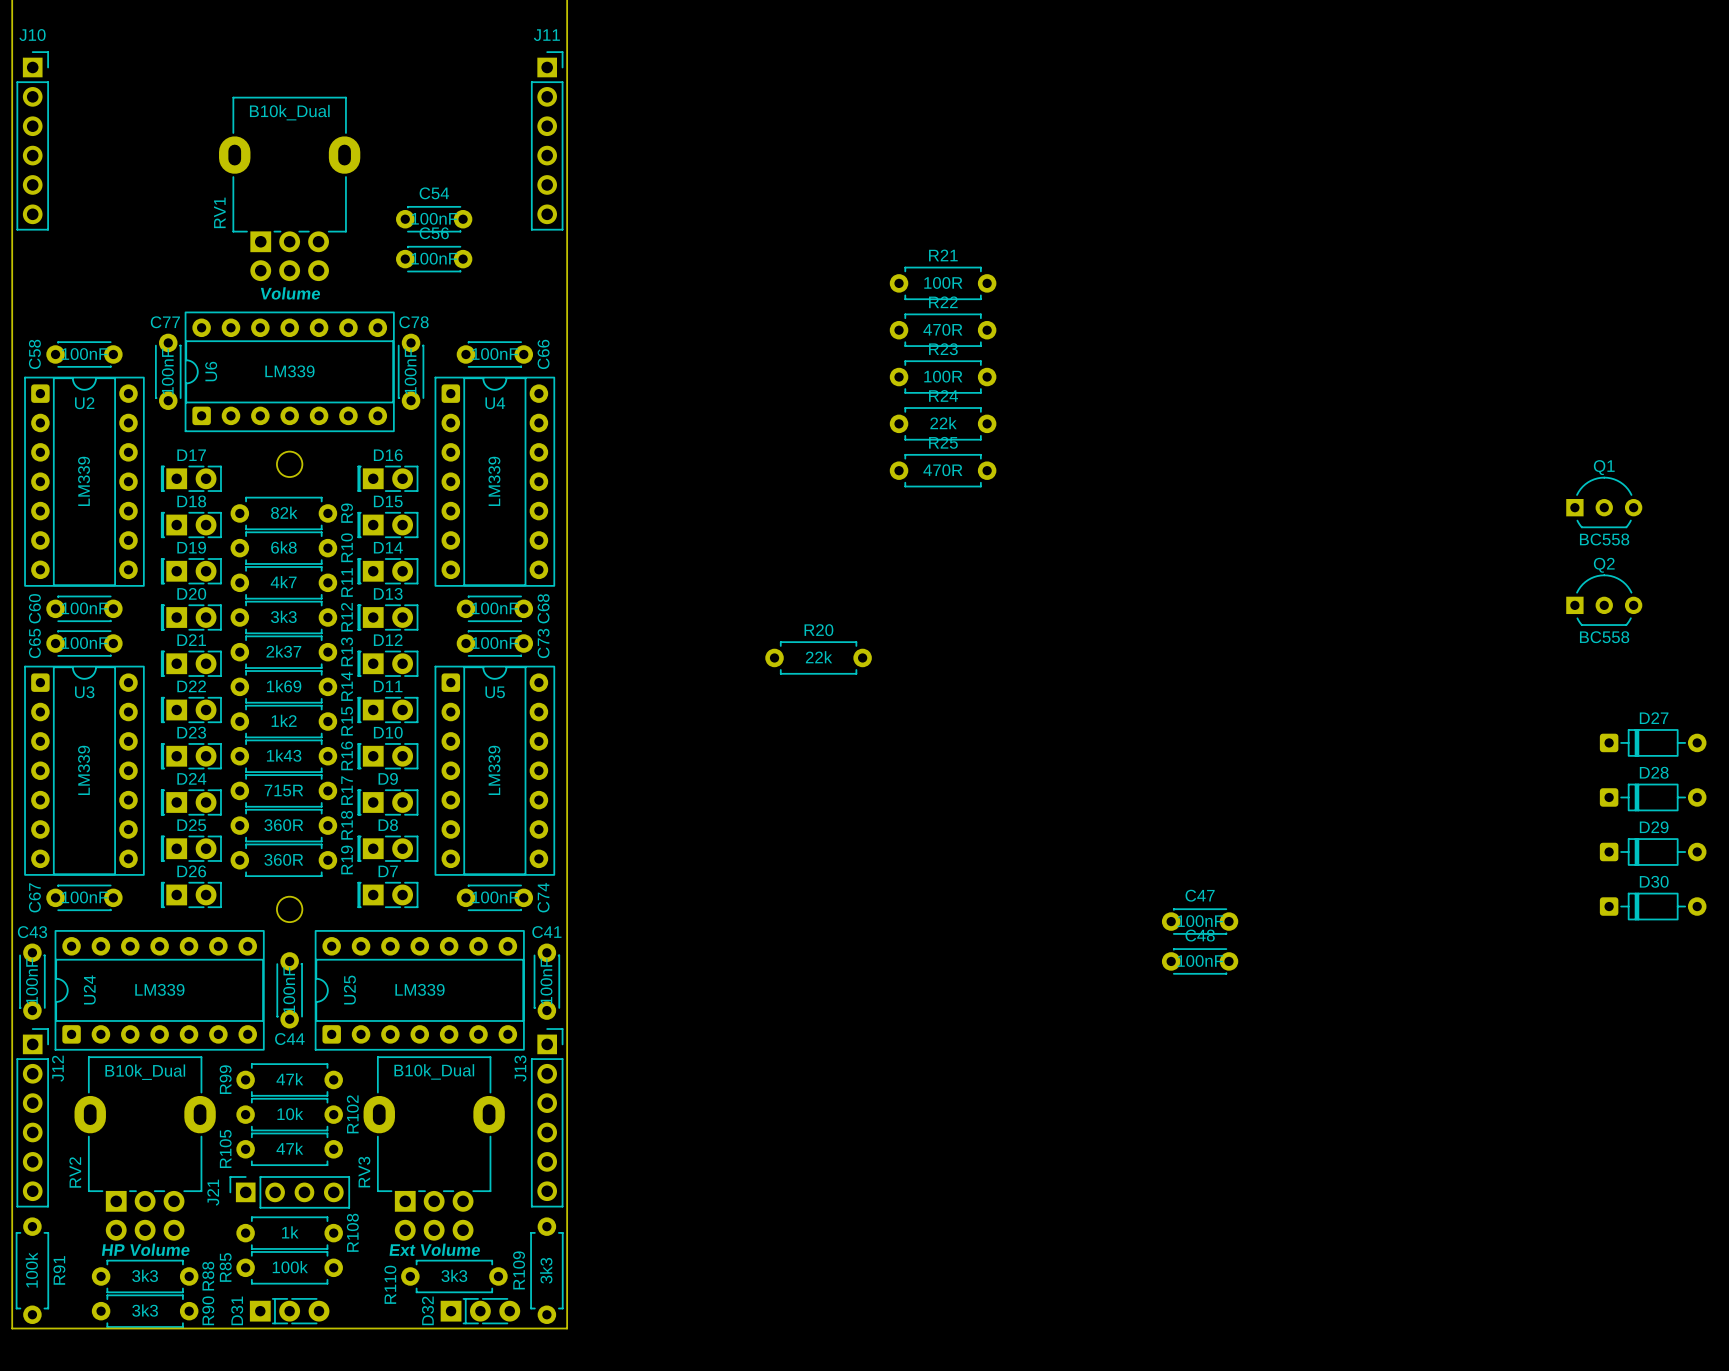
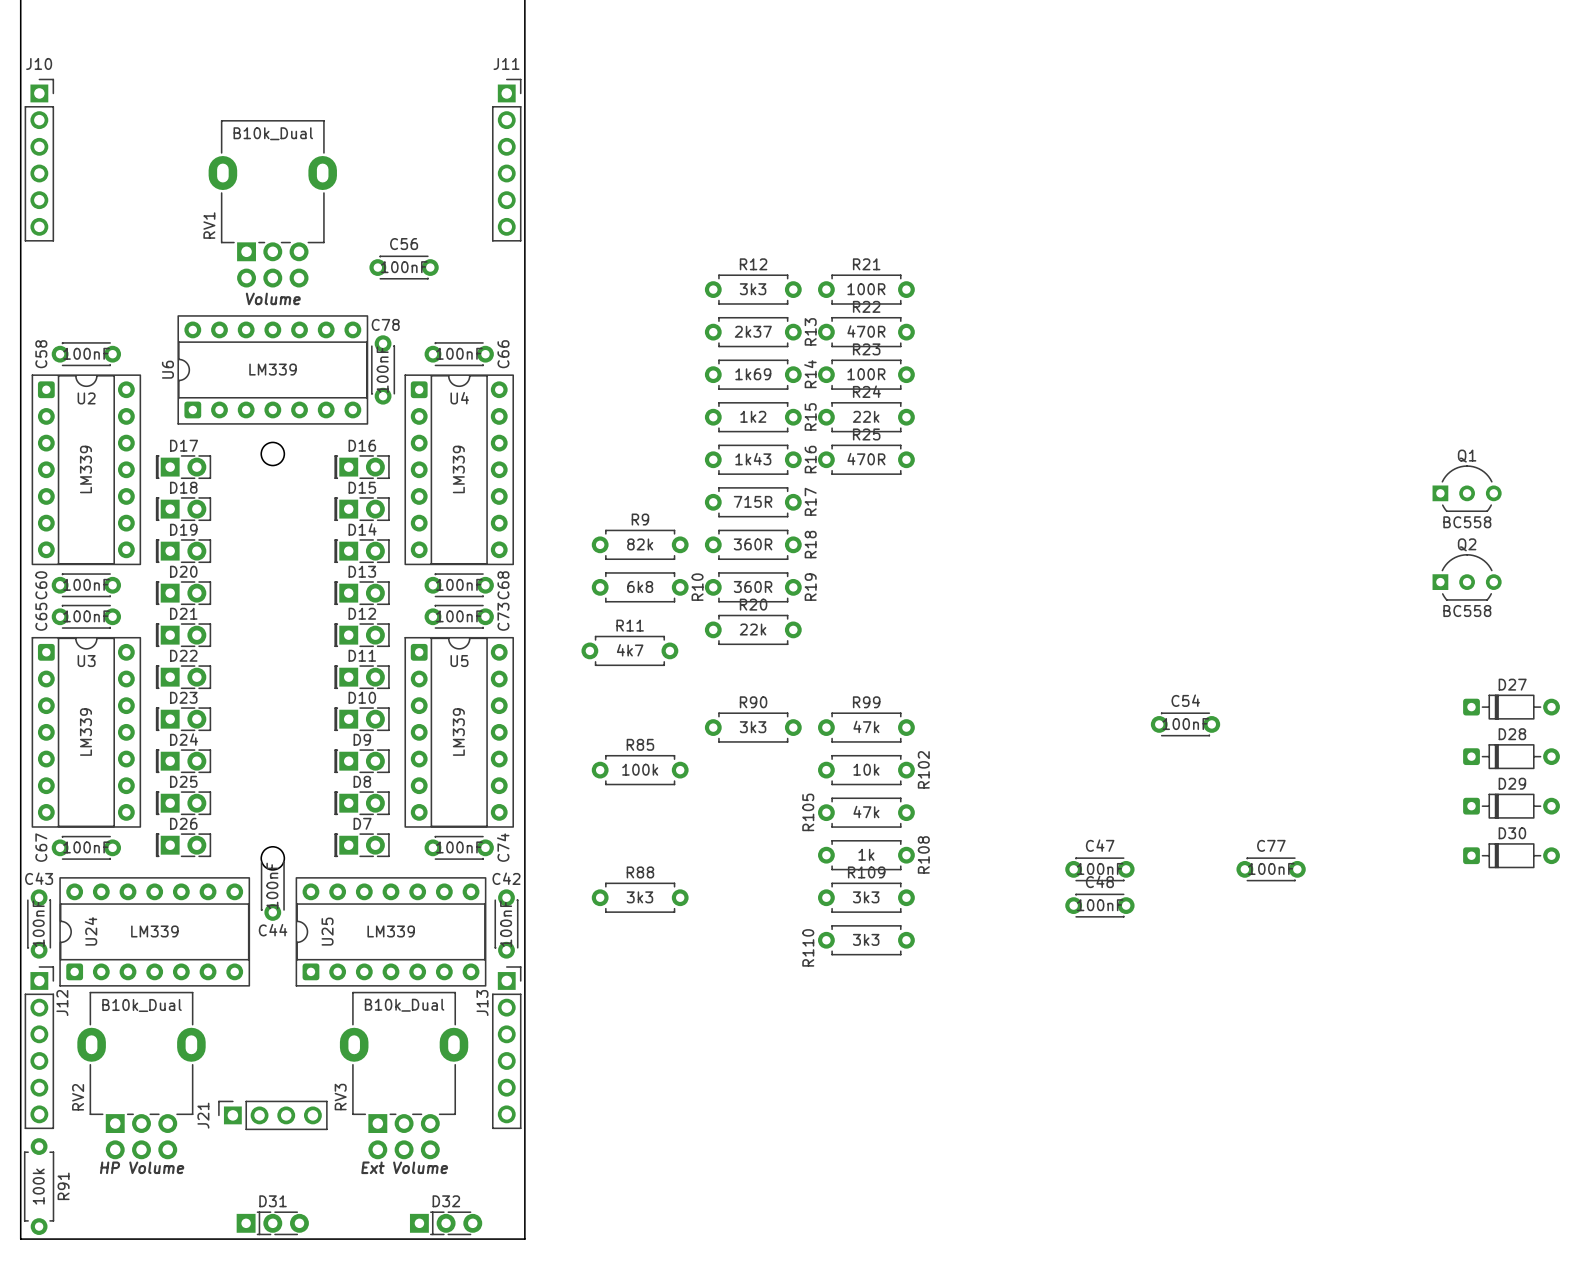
C54 position: (434, 219) -> (1185, 724)
C77 name position: C77 (165, 322) -> C77 (1271, 845)
C77 rotation: 0° (168, 371) -> 90° clockwise (1271, 869)
C77 position: (168, 371) -> (1271, 869)
U6 name position: U6 (211, 371) -> U6 (167, 369)
R9 position: (283, 513) -> (640, 544)
R9 name rotation: 0° (347, 513) -> 90° clockwise (640, 519)
R9 name position: R9 (347, 513) -> R9 (640, 519)
R10 position: (283, 548) -> (640, 587)
R11 position: (283, 582) -> (629, 650)
R11 name rotation: 0° (347, 582) -> 90° clockwise (630, 625)
R11 name position: R11 (347, 582) -> R11 (630, 625)
R12 position: (283, 617) -> (753, 289)
R12 name rotation: 0° (346, 617) -> 90° clockwise (753, 264)
R12 name position: R12 (346, 617) -> R12 (753, 264)
R13 position: (283, 652) -> (753, 332)
R14 position: (283, 686) -> (753, 374)
R15 position: (283, 721) -> (753, 417)
R16 position: (283, 756) -> (753, 459)
R17 position: (283, 790) -> (753, 502)
R18 position: (283, 825) -> (753, 544)
R19 position: (283, 860) -> (753, 587)
C41 name: C41 (546, 932) -> C42 (506, 878)
C44 position: (289, 990) -> (272, 886)
R99 name rotation: 0° (225, 1079) -> 90° clockwise (866, 702)
R99 name position: R99 (225, 1079) -> R99 (866, 702)
R99 position: (289, 1079) -> (866, 727)
R102 position: (289, 1114) -> (866, 770)
R105 position: (289, 1149) -> (866, 812)
R108 position: (289, 1233) -> (866, 855)
R85 name rotation: 0° (225, 1267) -> 90° clockwise (640, 744)
R85 name position: R85 (225, 1267) -> R85 (640, 744)
R85 position: (289, 1267) -> (640, 770)
R109 rotation: 0° (546, 1270) -> 90° clockwise (866, 897)
R109 position: (546, 1270) -> (866, 897)
R88 position: (145, 1276) -> (640, 897)
R88 name rotation: 0° (208, 1276) -> 90° clockwise (640, 872)
R88 name position: R88 (208, 1276) -> R88 (640, 872)
R110 position: (454, 1276) -> (866, 940)
R90 name rotation: 0° (208, 1310) -> 90° clockwise (753, 702)
R90 name position: R90 (208, 1310) -> R90 (753, 702)
D31 name rotation: 0° (237, 1310) -> 90° clockwise (273, 1201)
D31 name position: D31 (237, 1310) -> D31 (273, 1201)
D32 name rotation: 0° (427, 1310) -> 90° clockwise (446, 1201)
D32 name position: D32 (427, 1310) -> D32 (446, 1201)
R90 position: (145, 1311) -> (753, 727)

